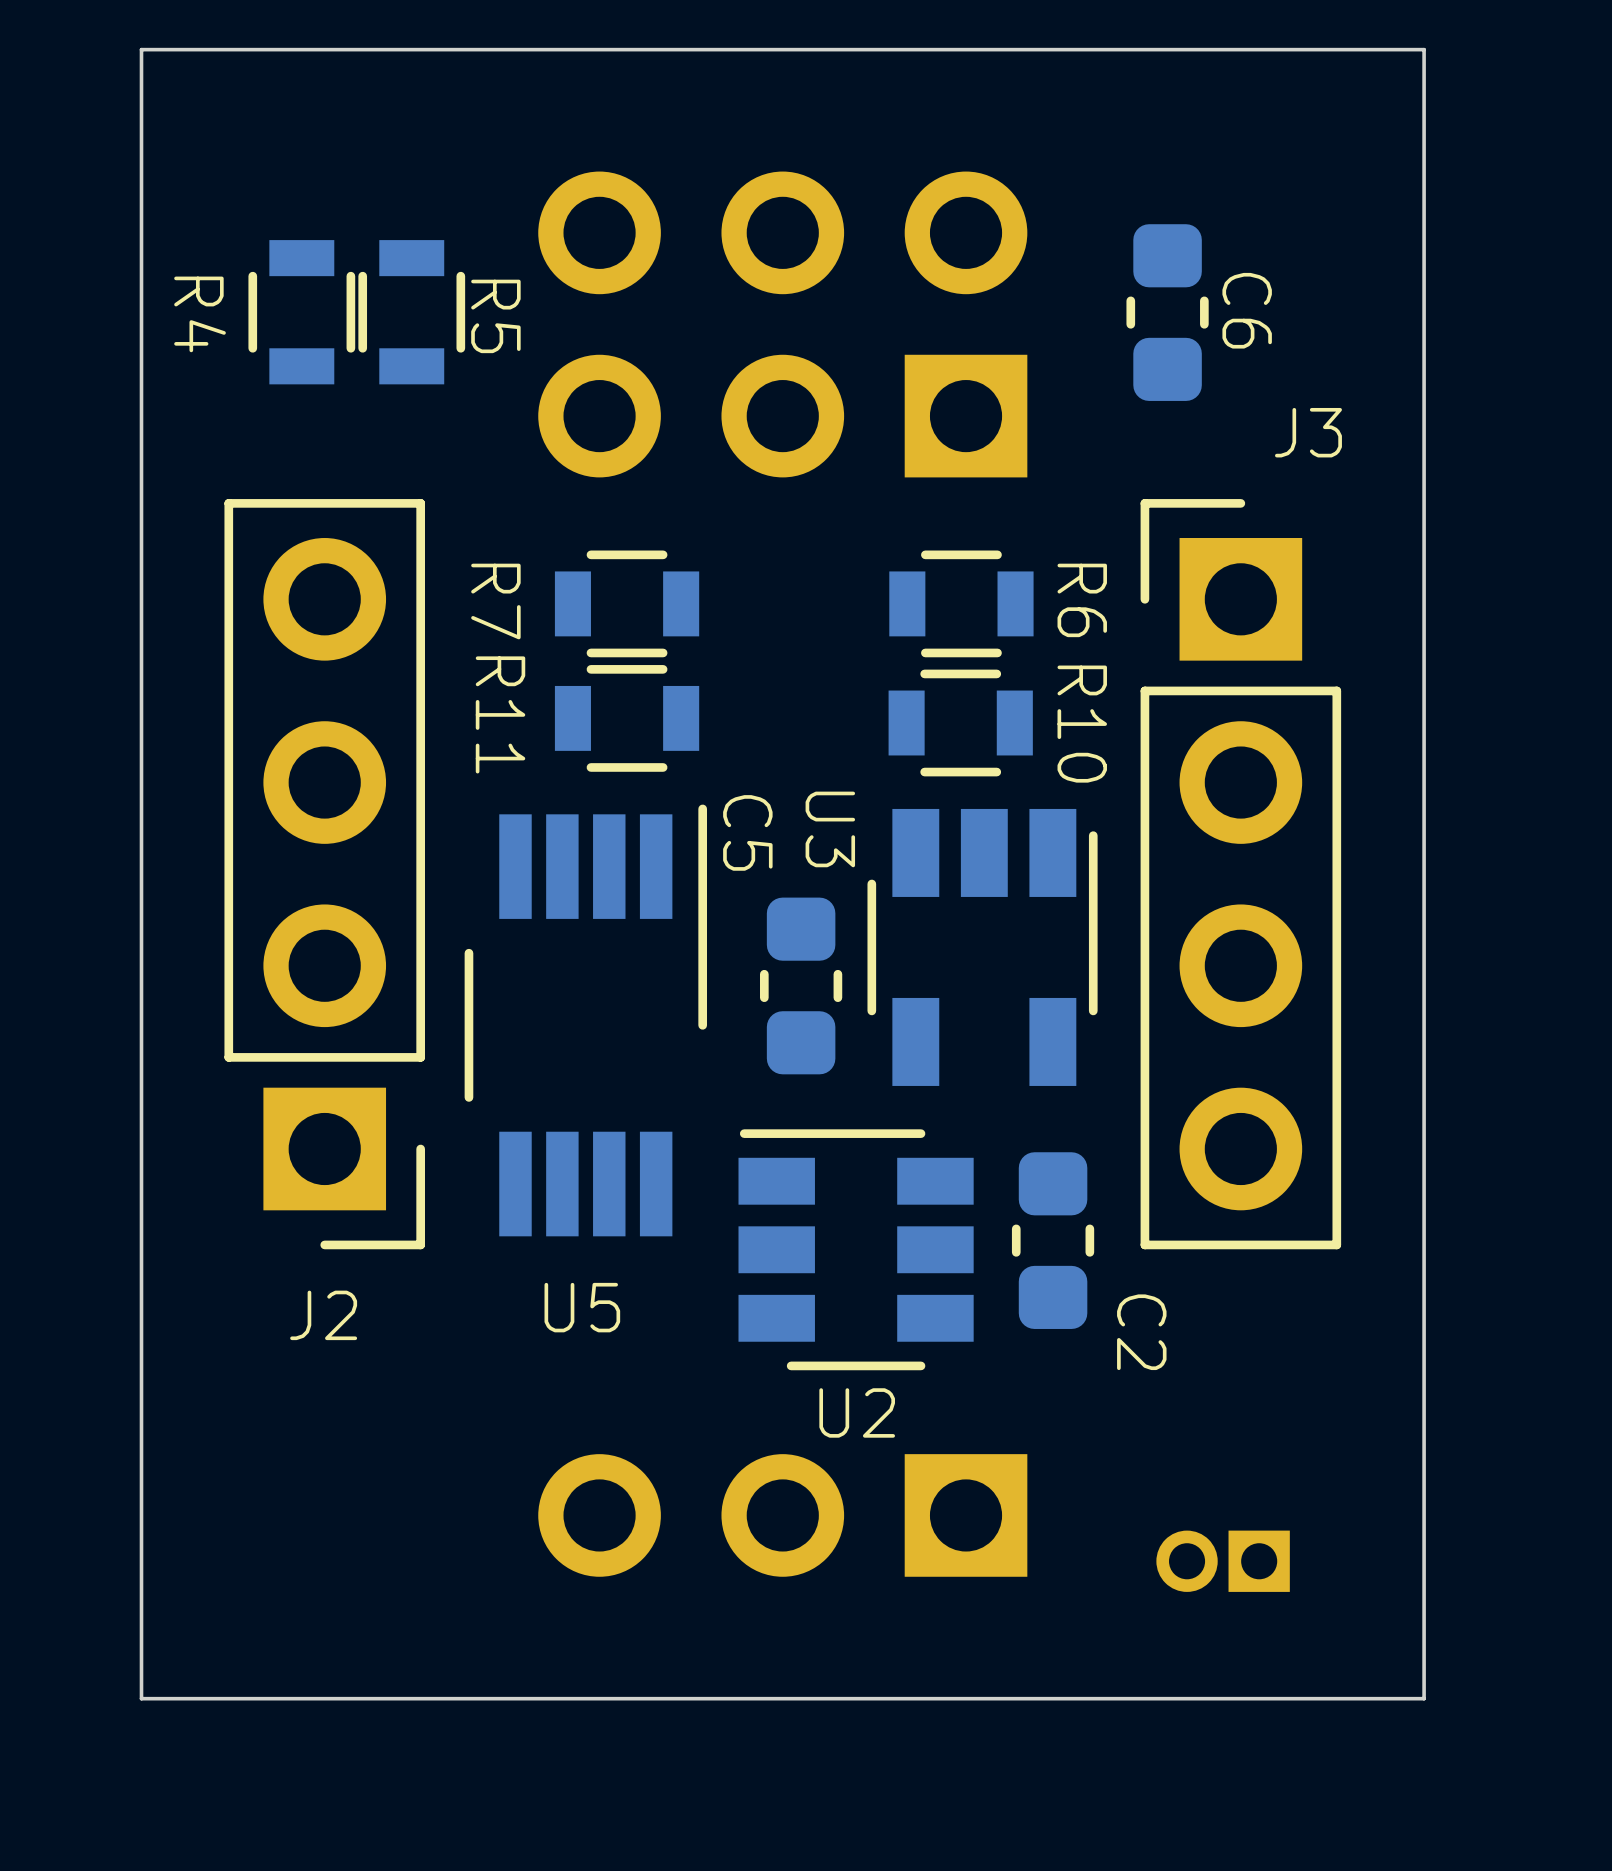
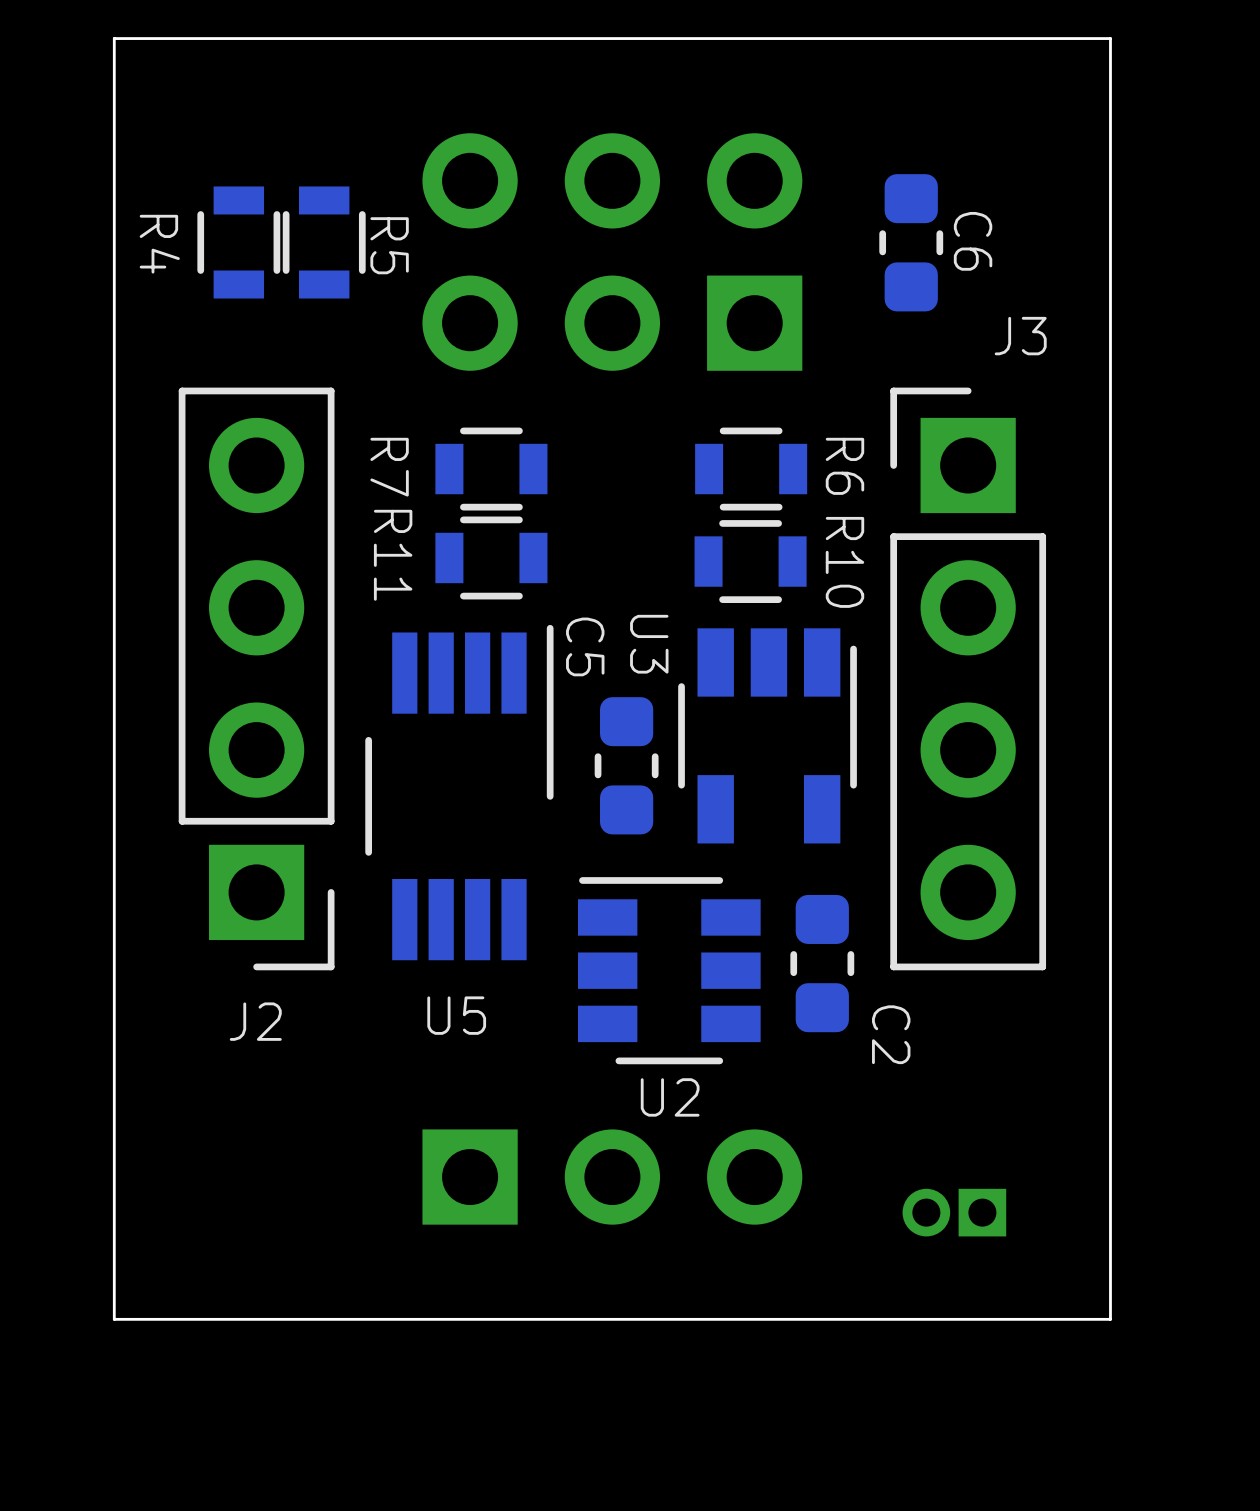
part rotation: 0° (782, 1515) -> 180° (612, 1177)

